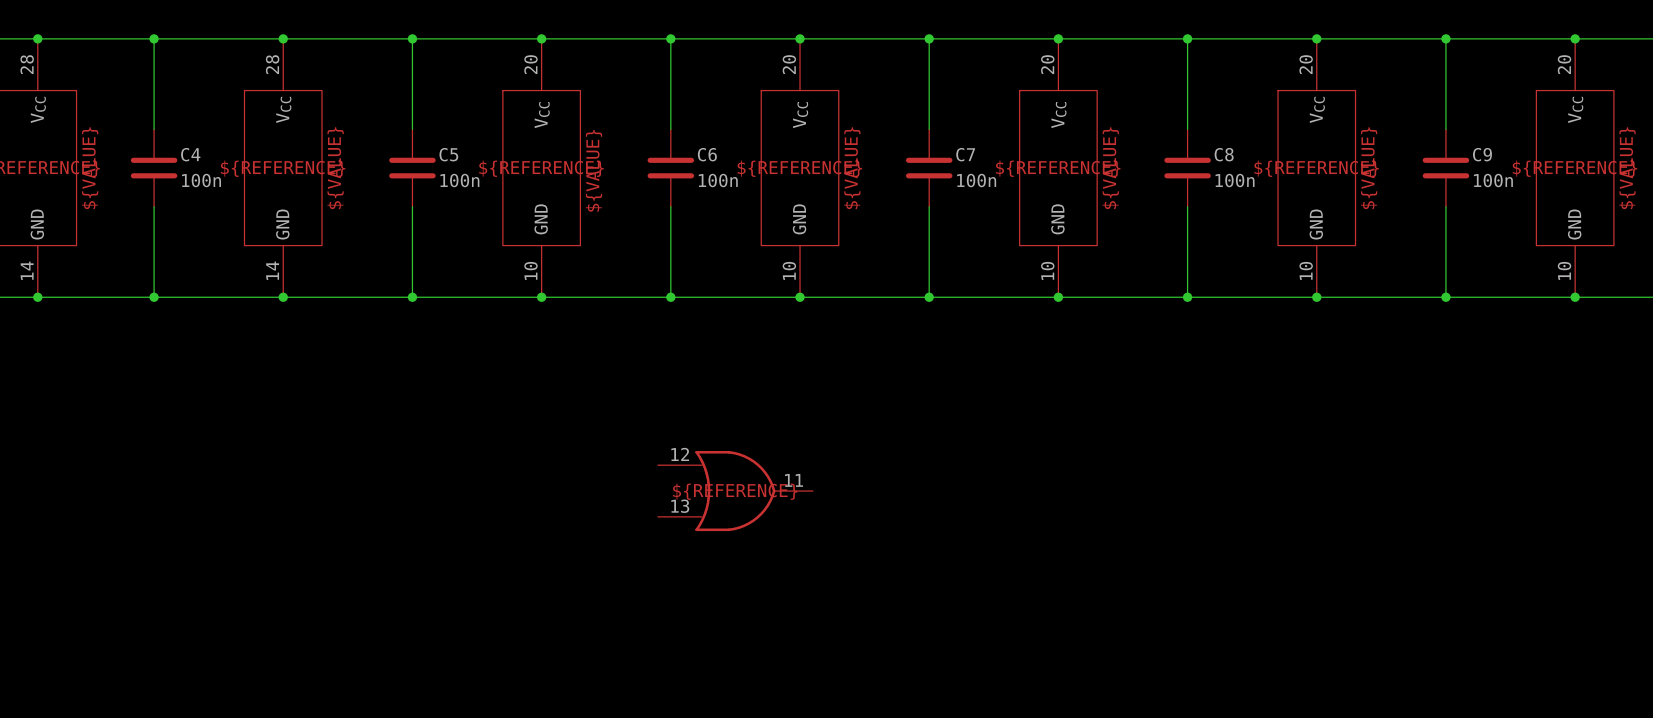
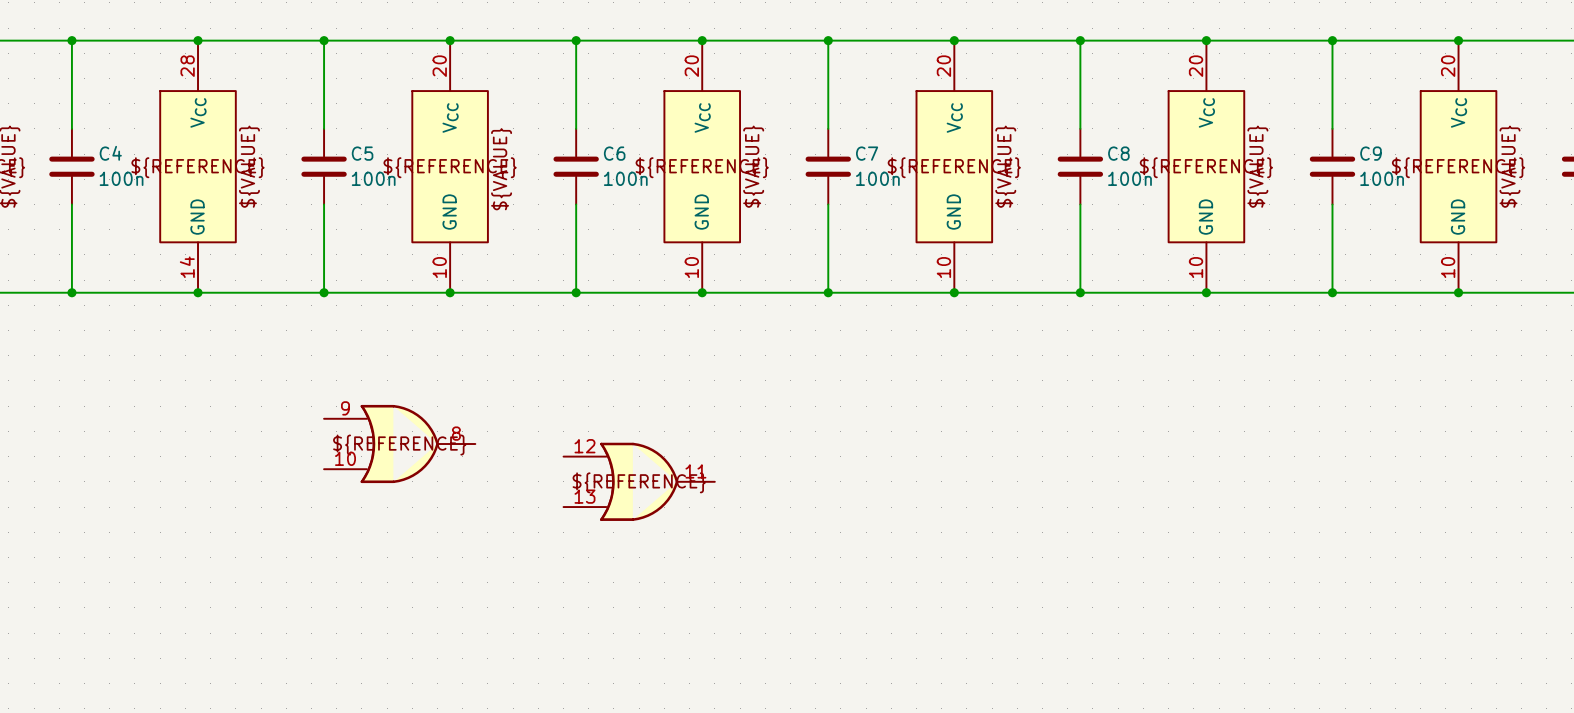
part: none -> (399, 444)

